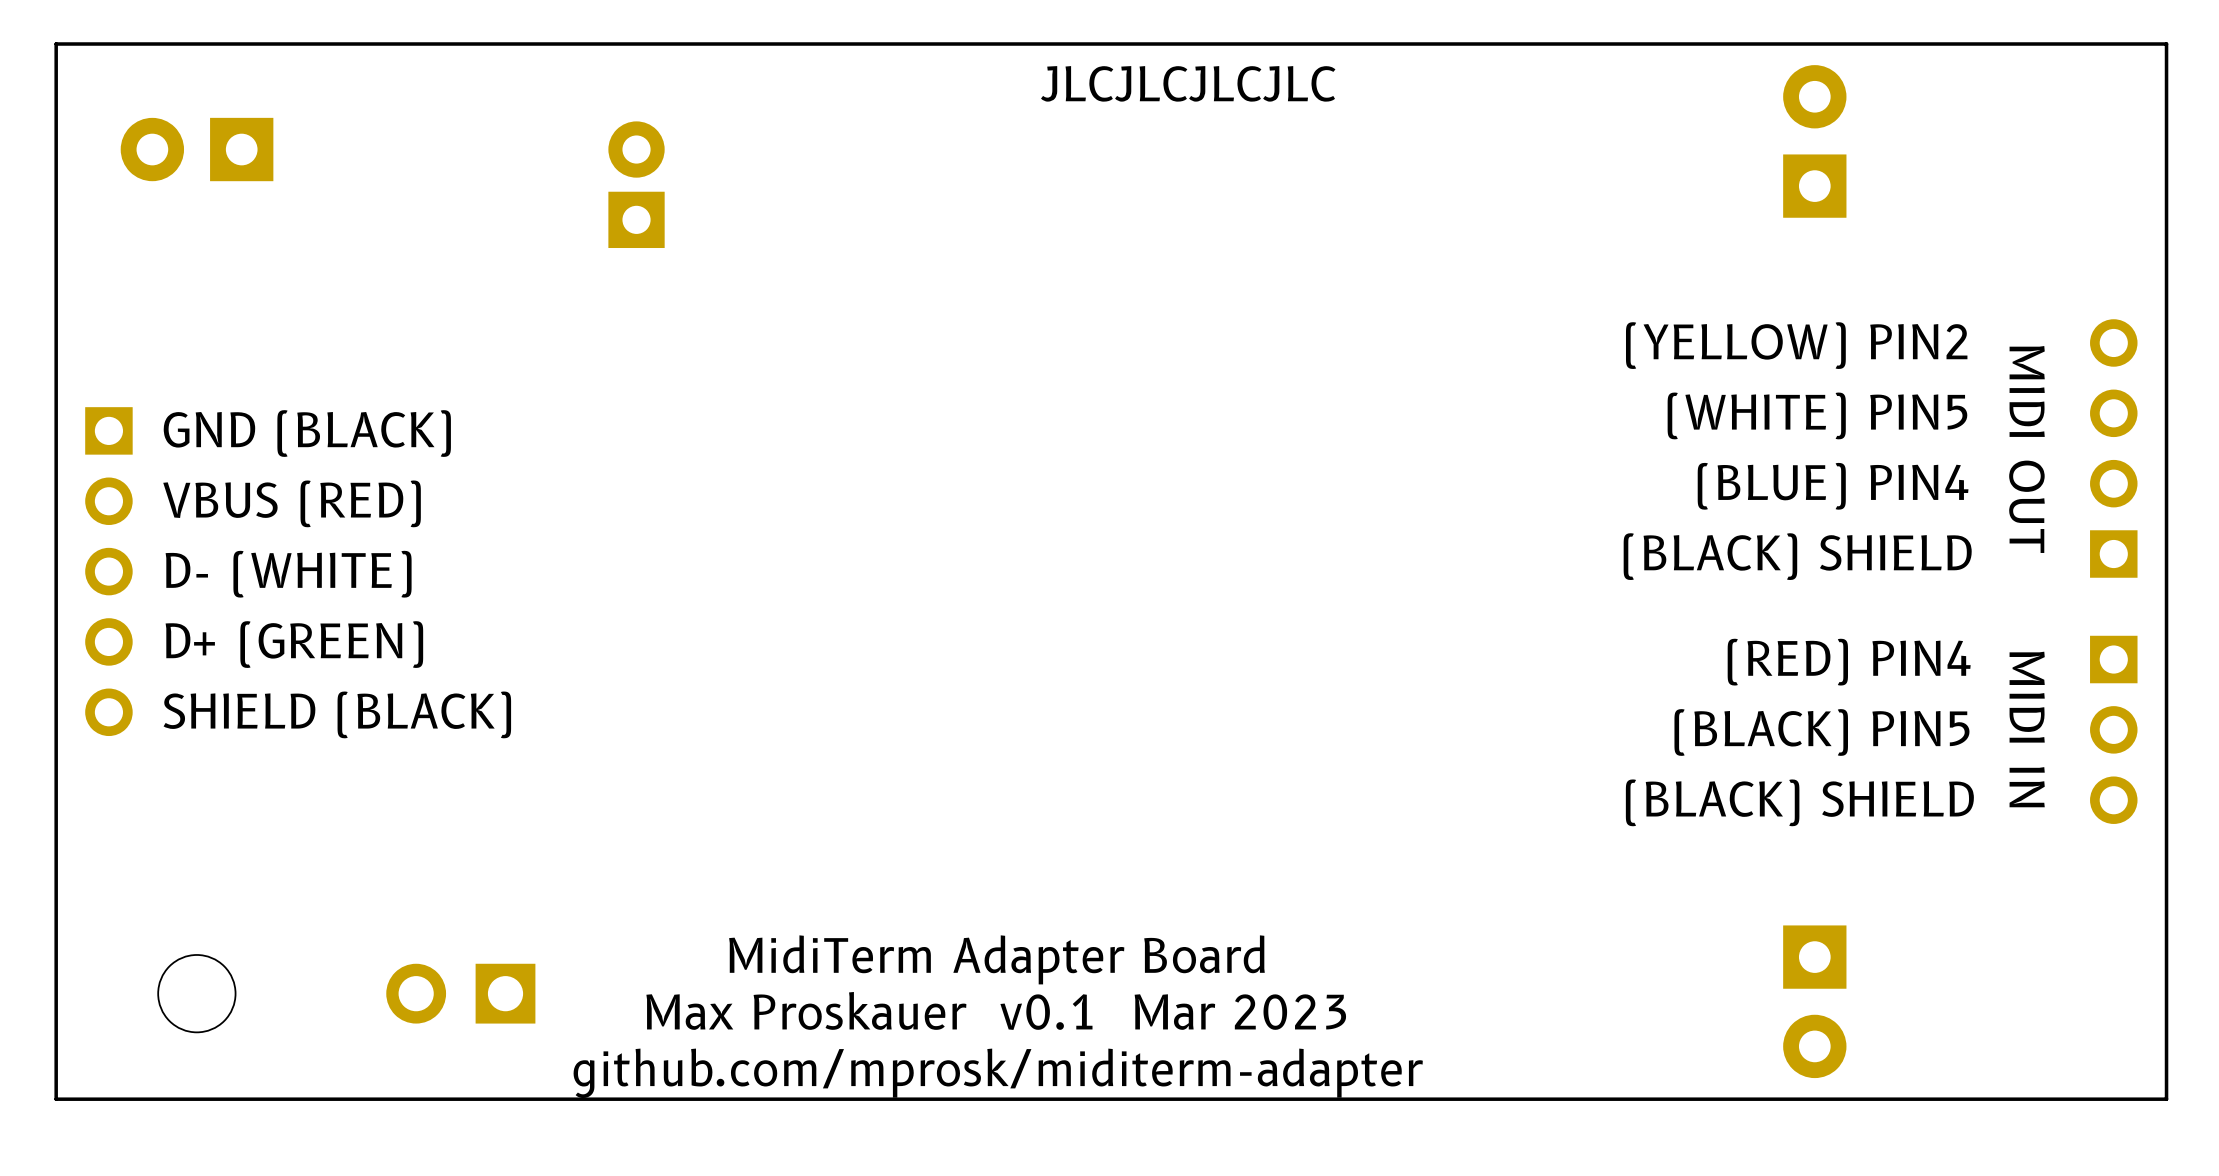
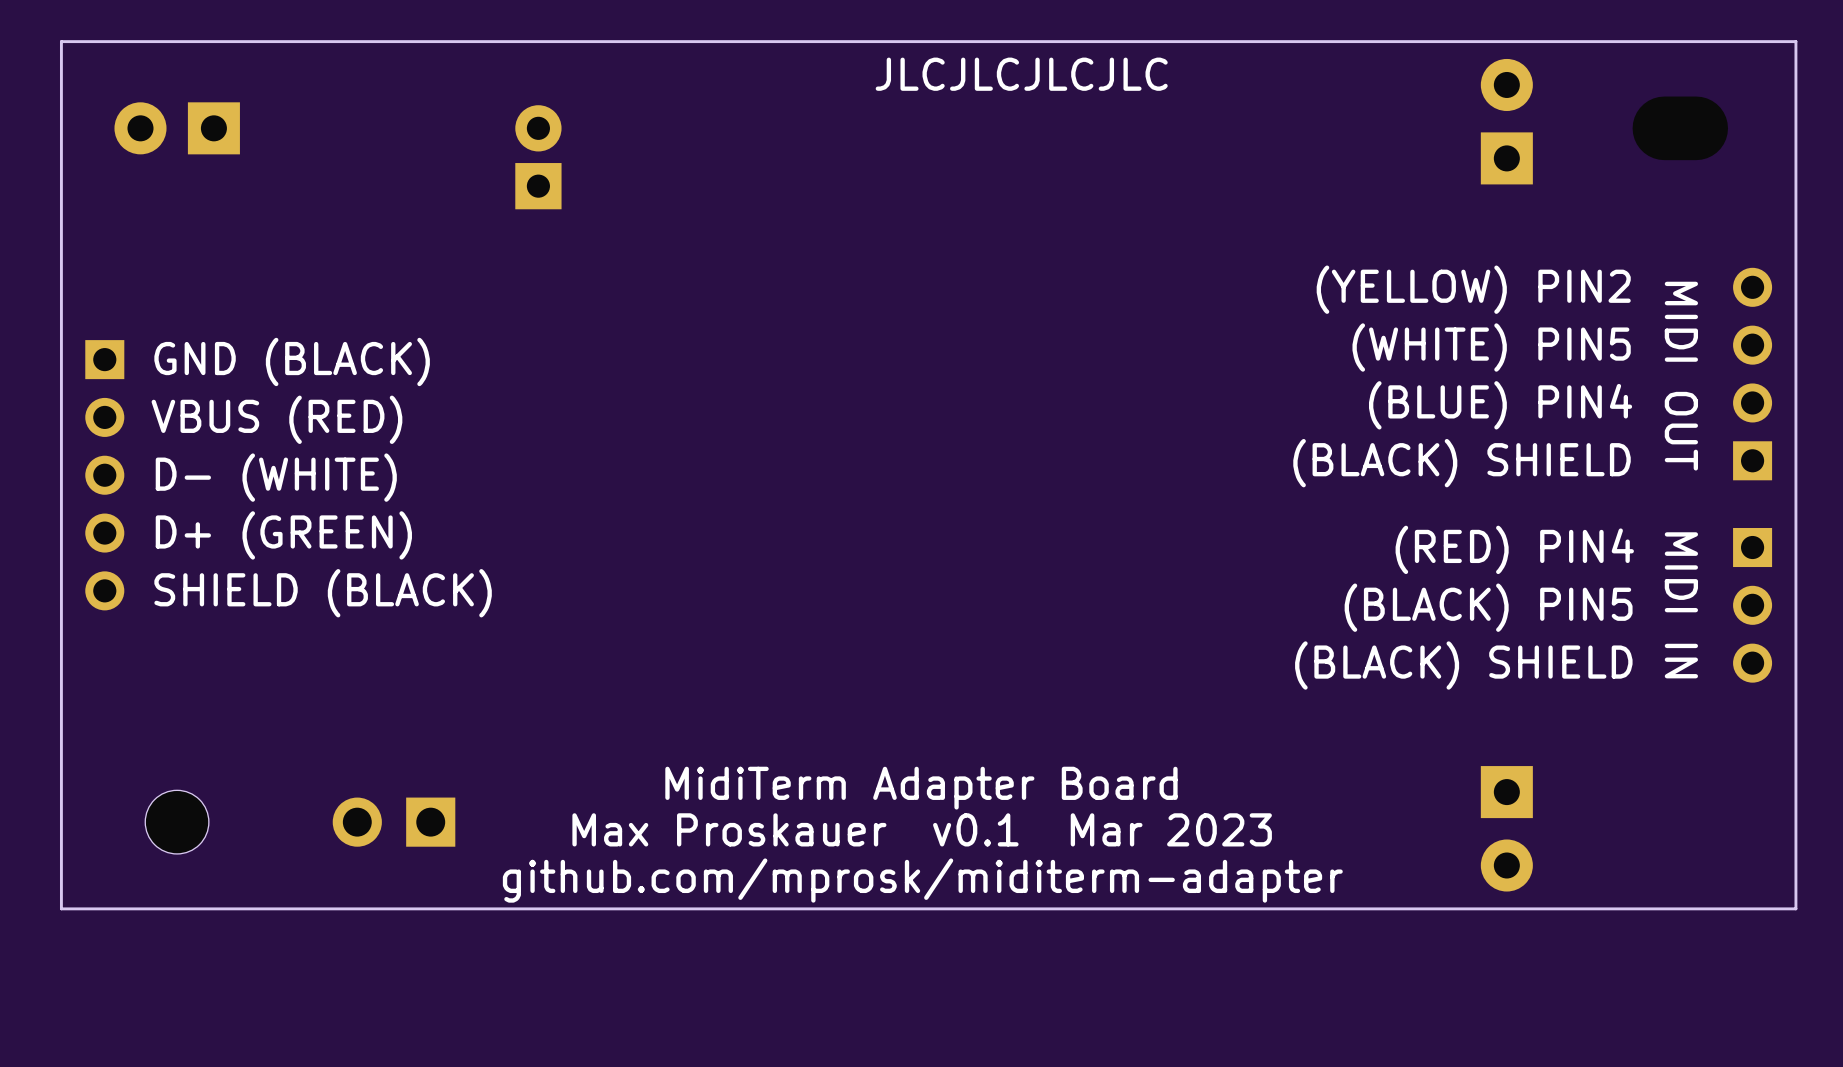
text position: MidiTerm Adapter Board (996, 959) -> MidiTerm Adapter Board (921, 788)
text position: Max Proskauer v0.1 Mar 2023 (996, 1010) -> Max Proskauer v0.1 Mar 2023 (922, 829)
text position: github.com/mprosk/miditerm-adapter (998, 1073) -> github.com/mprosk/miditerm-adapter (922, 880)

